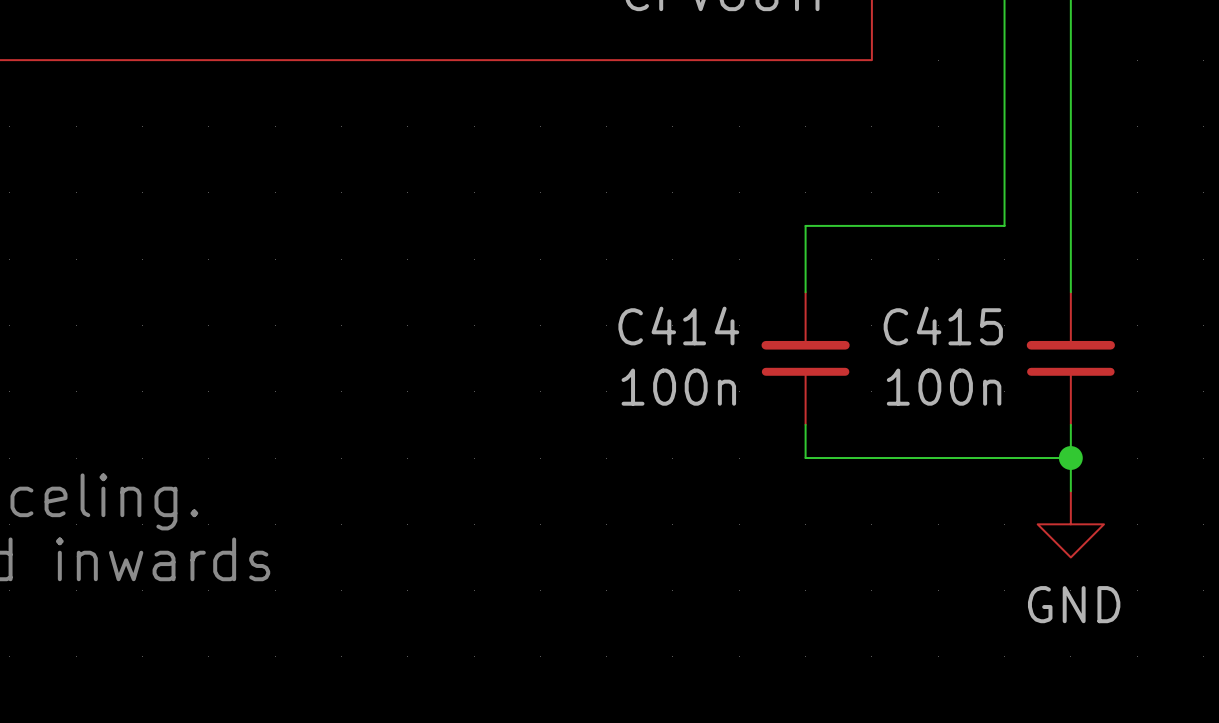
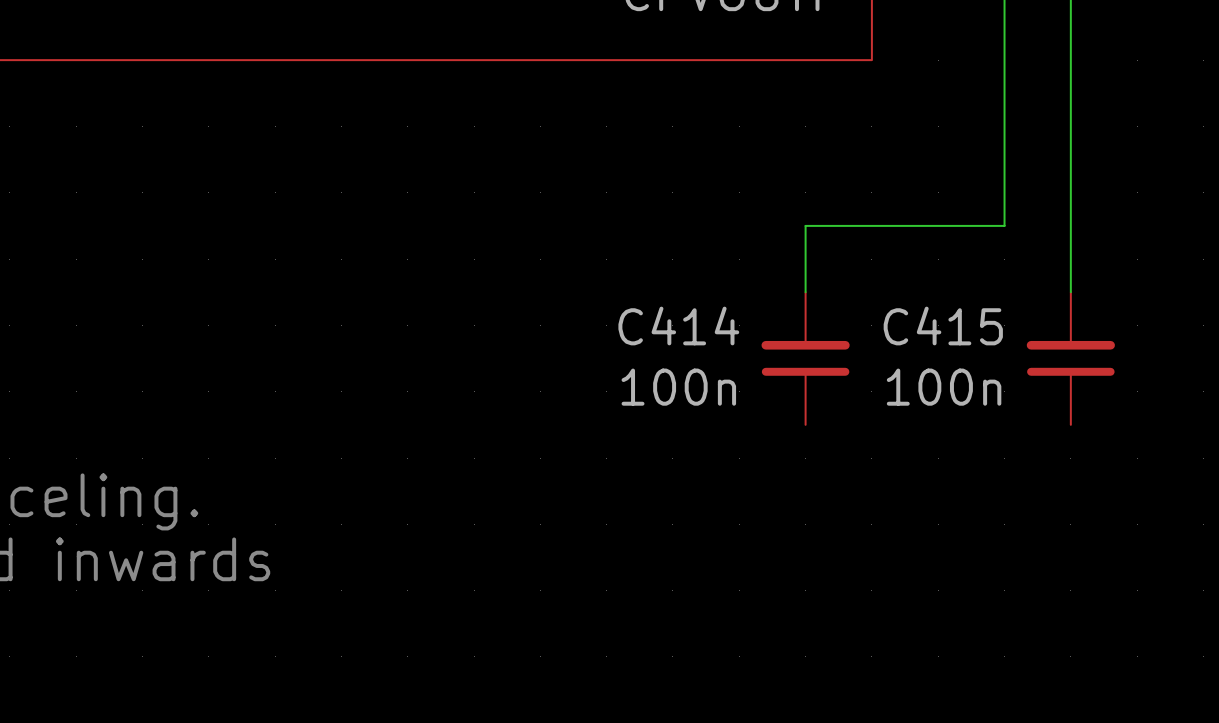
wire: (805, 424) (805, 458) (1070, 458) -> none
wire: (1070, 424) (1070, 491) -> none
junction: (1070, 458) -> none
power symbol: GND (1070, 524) -> none

